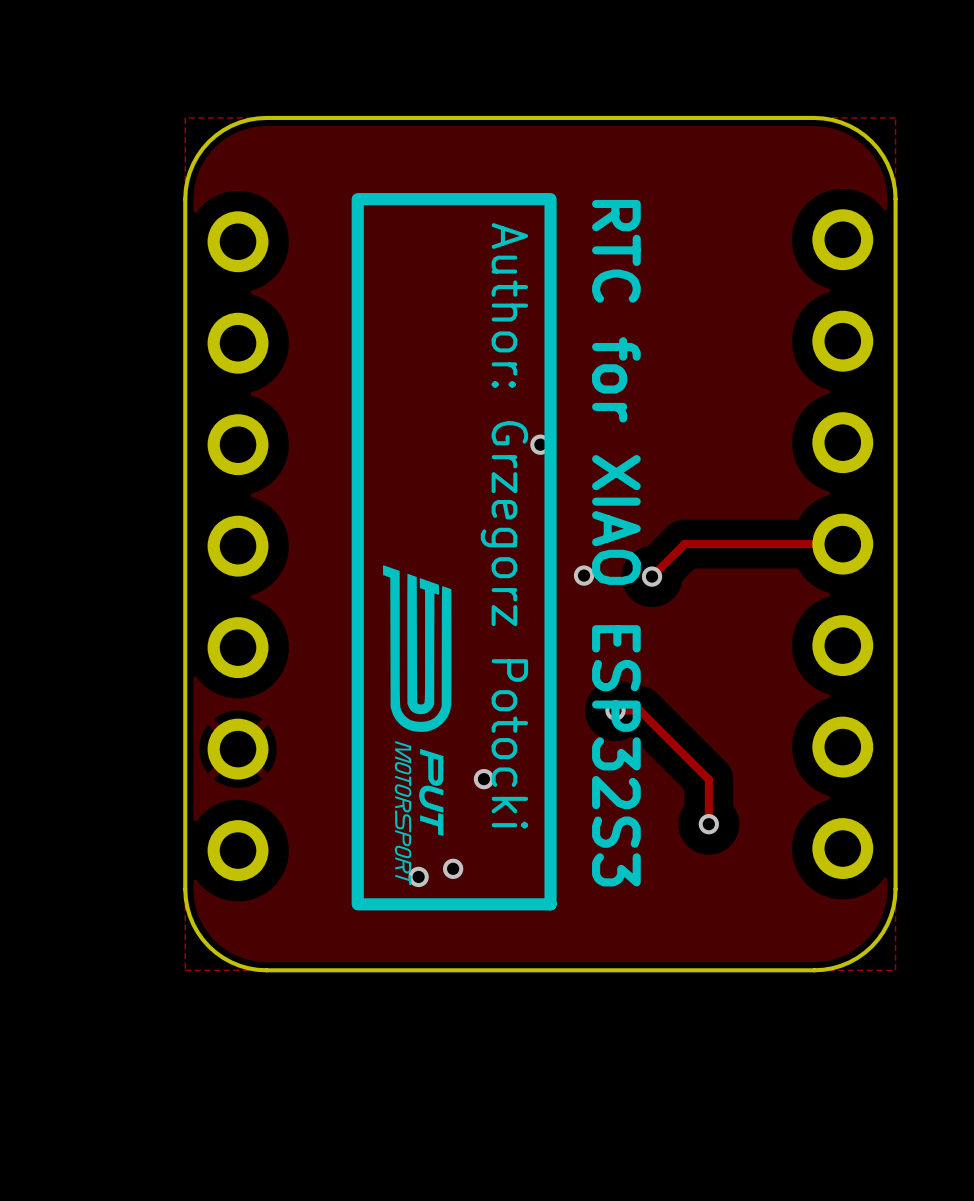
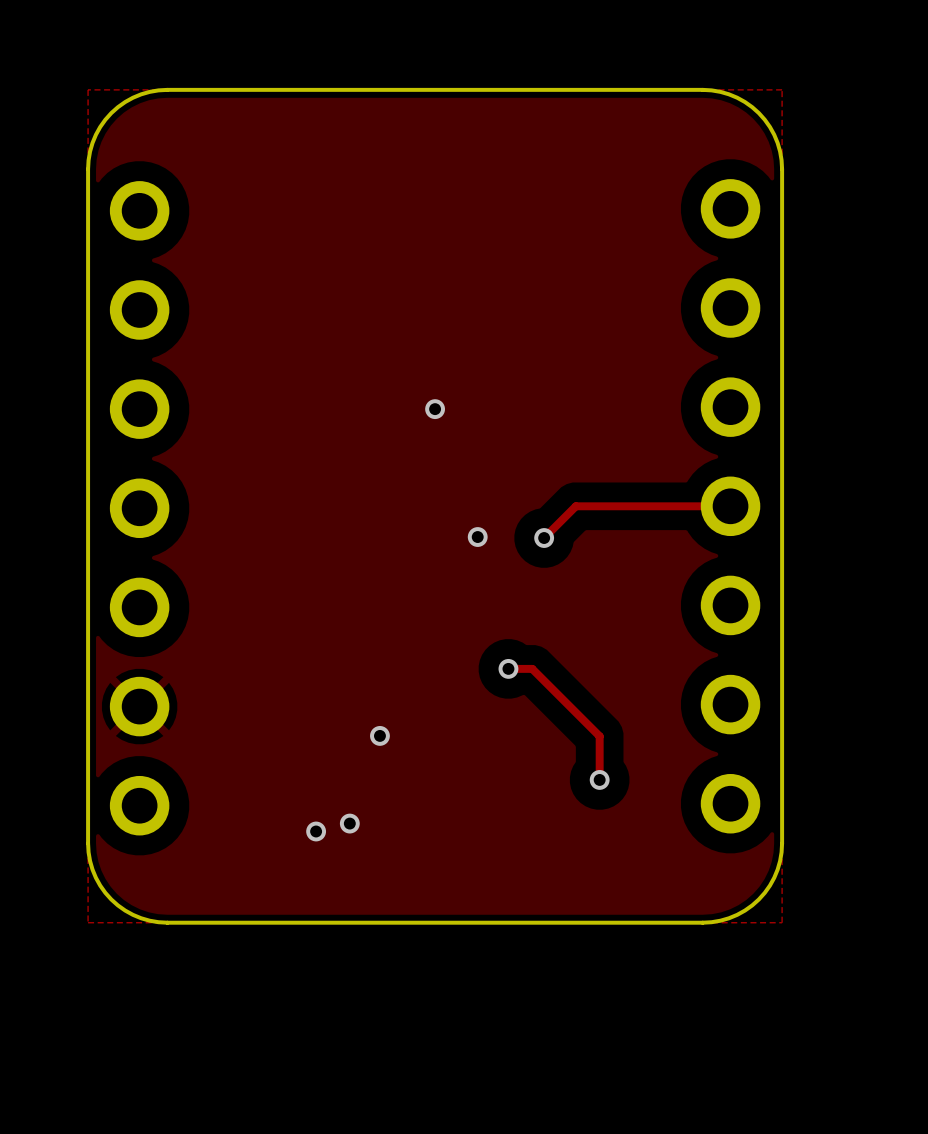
drawing: [351, 193, 557, 911] -> none
text: RTC for XIAO ESP32S3 (616, 543) -> none

